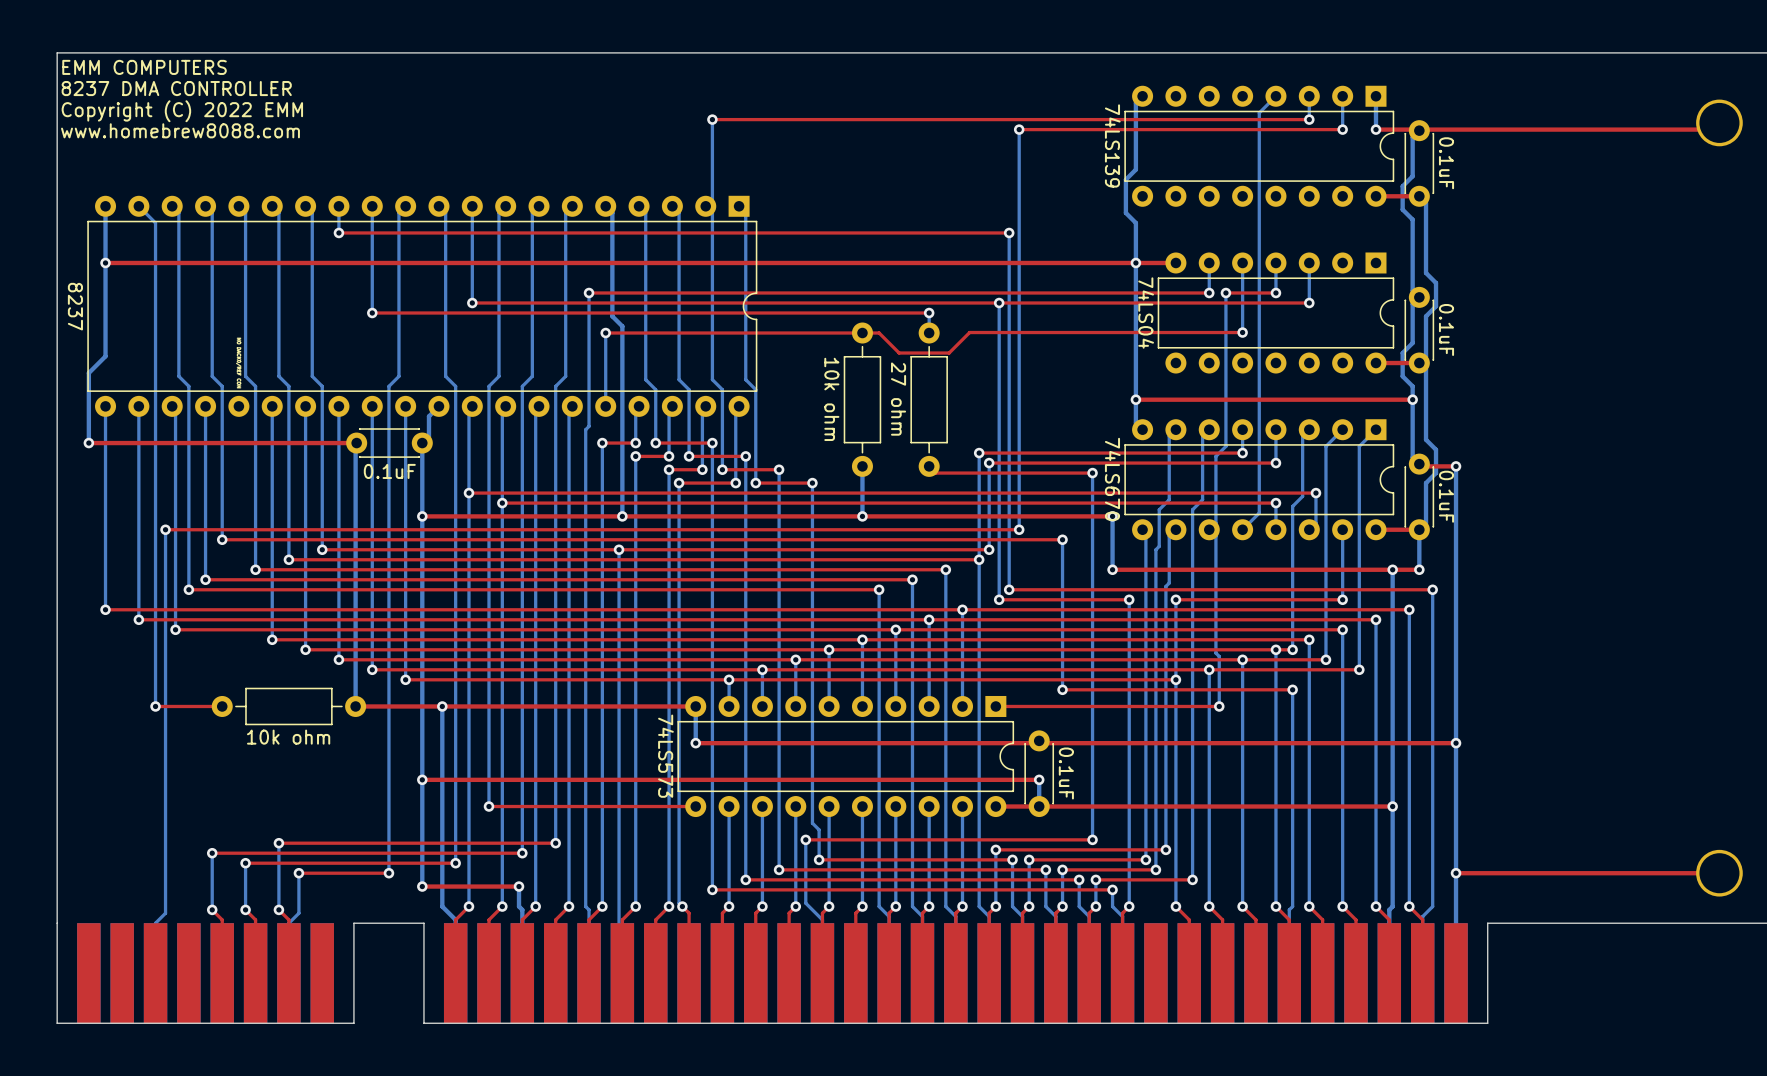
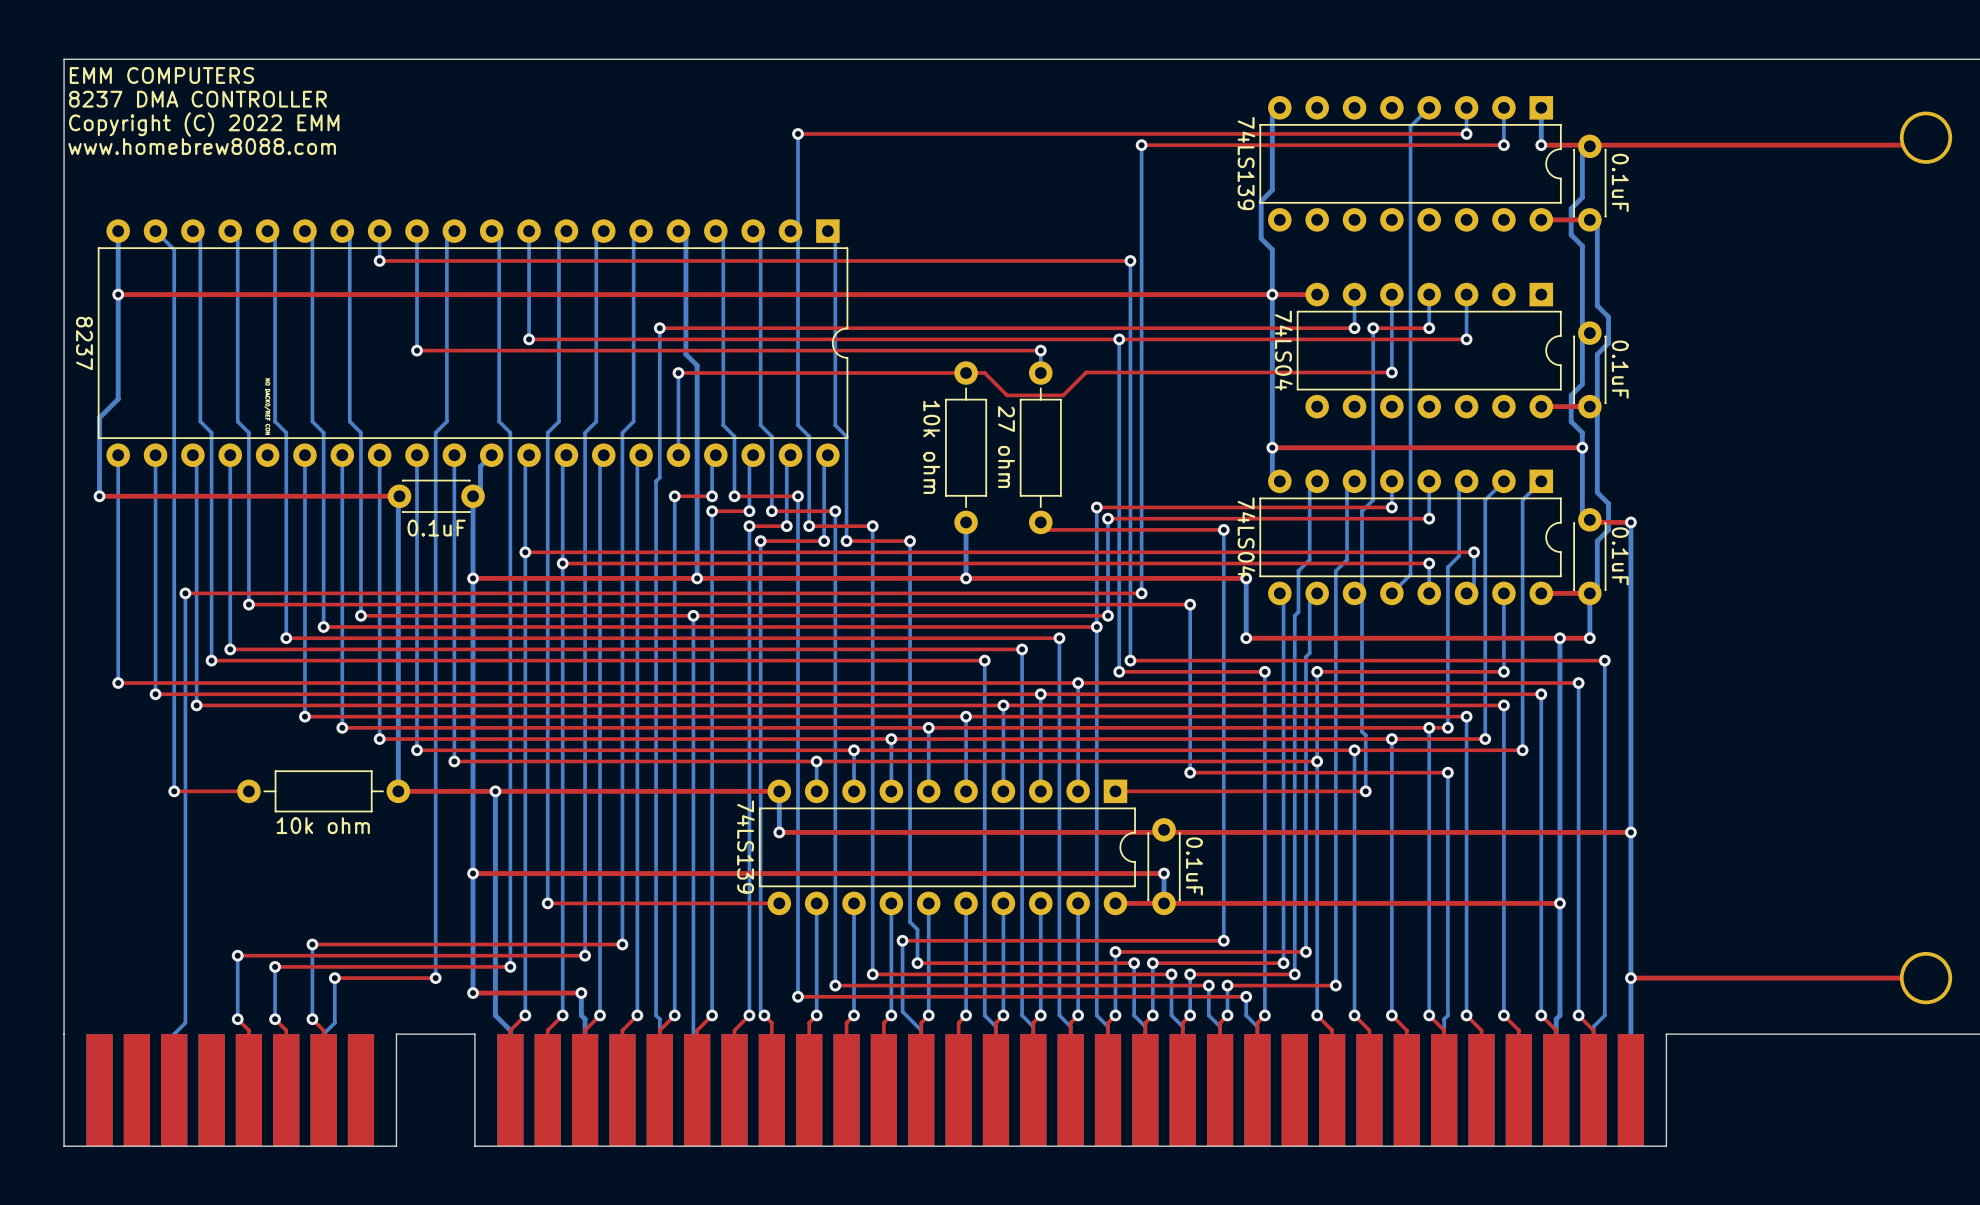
part value: 74LS670 (1112, 479) -> 74LS04 (1246, 537)
part value: 74LS573 (665, 756) -> 74LS139 (745, 847)

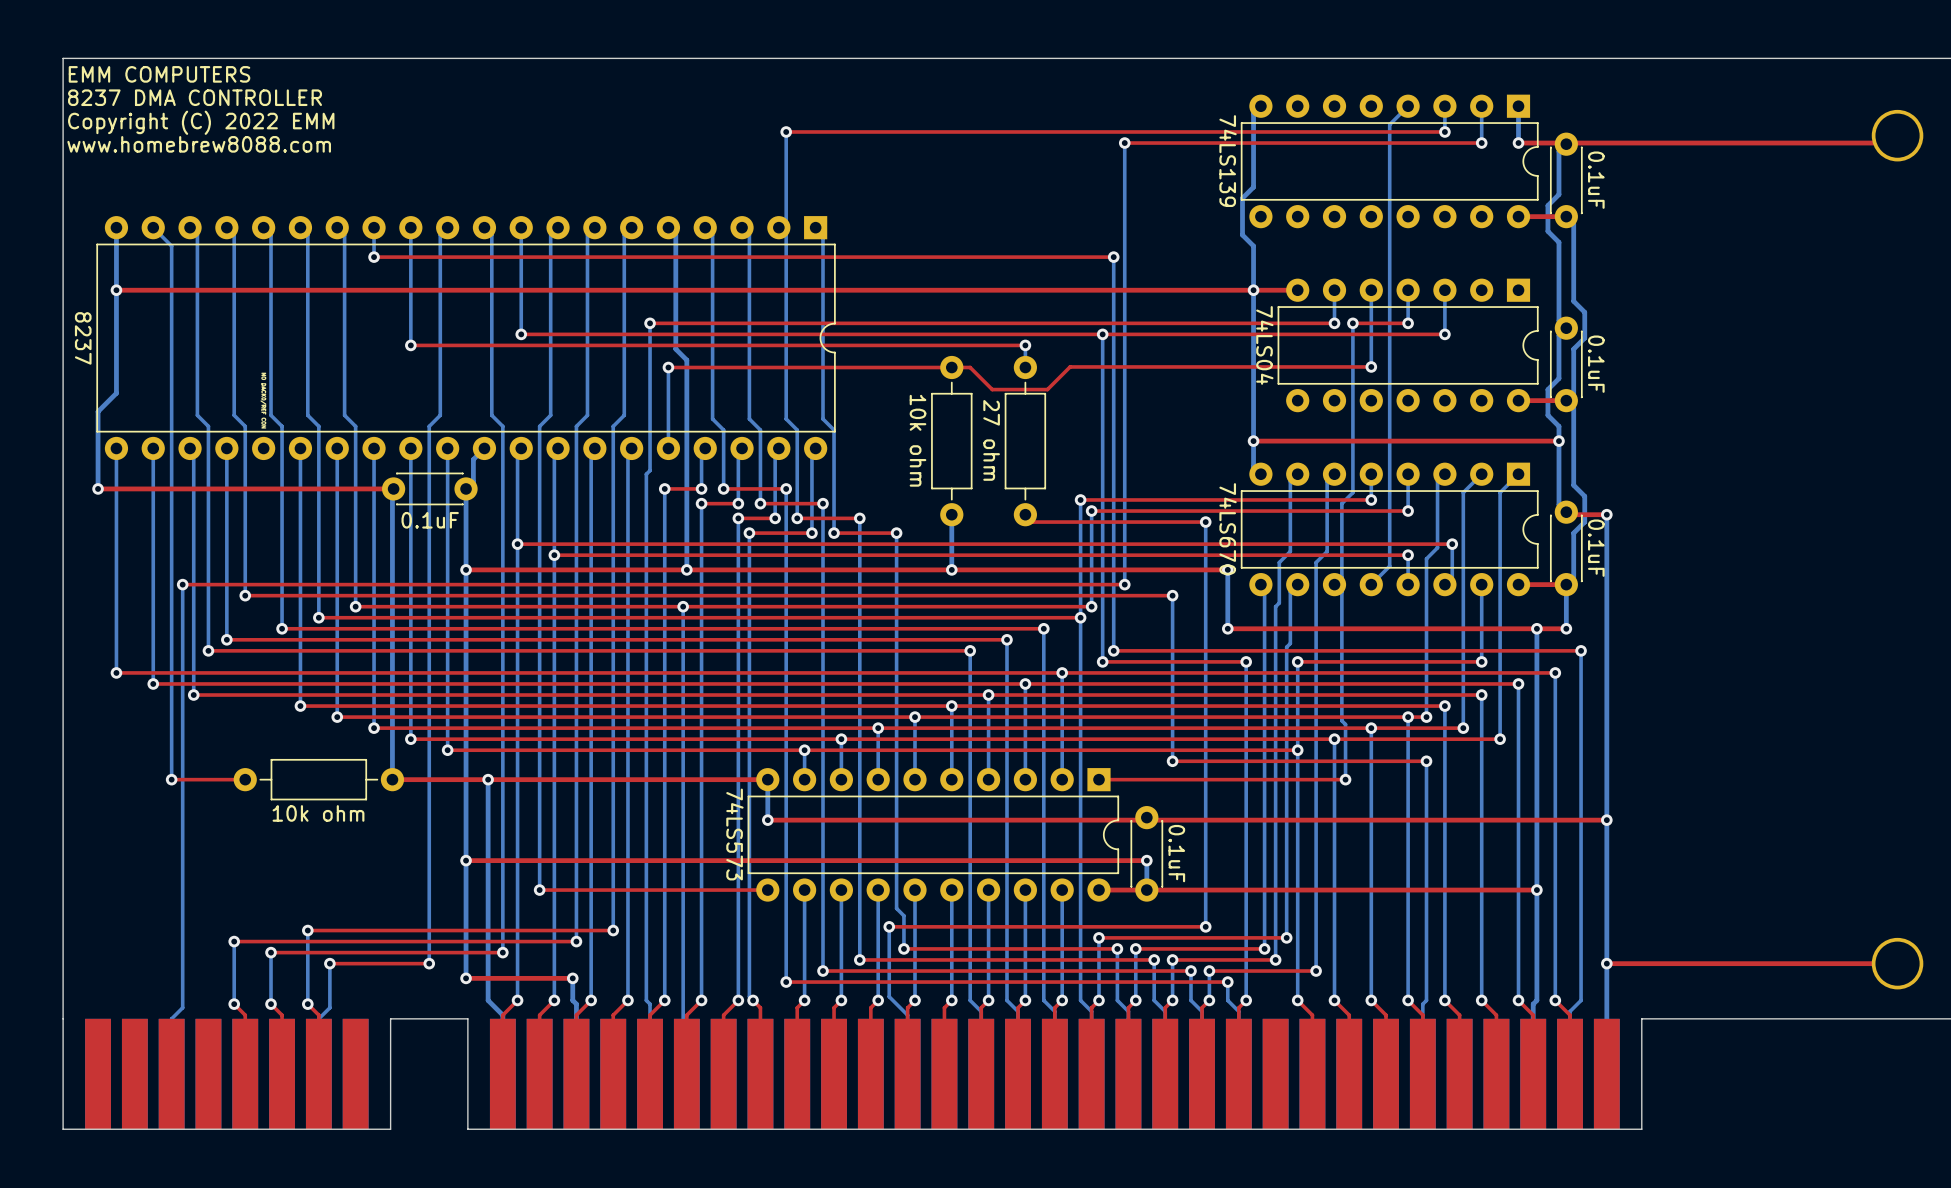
part value: 74LS04 (1246, 537) -> 74LS670 (1228, 529)
part value: 74LS139 (745, 847) -> 74LS573 (734, 834)

